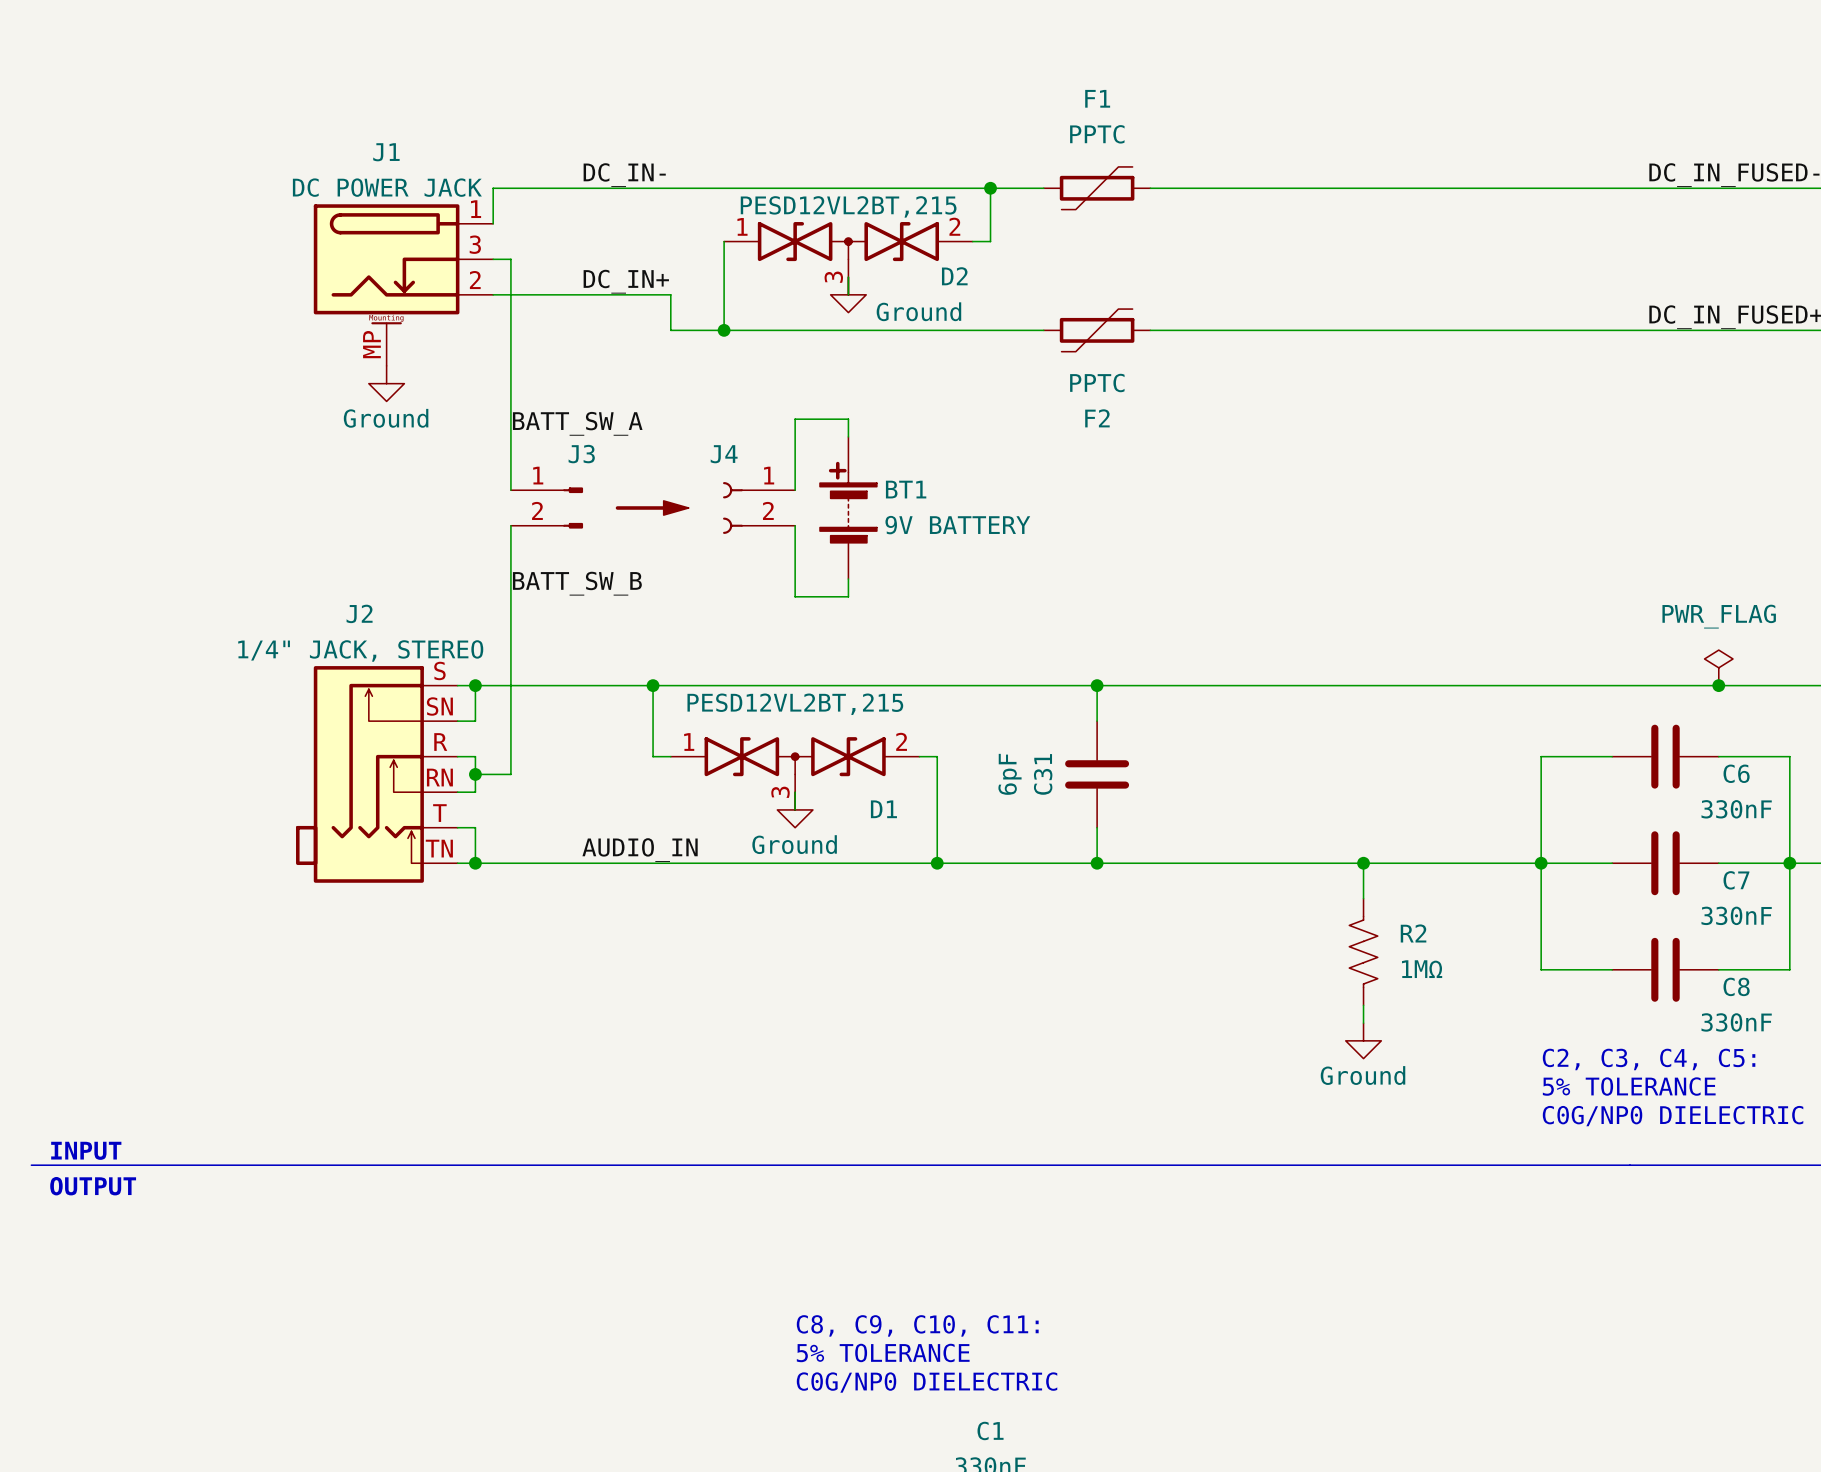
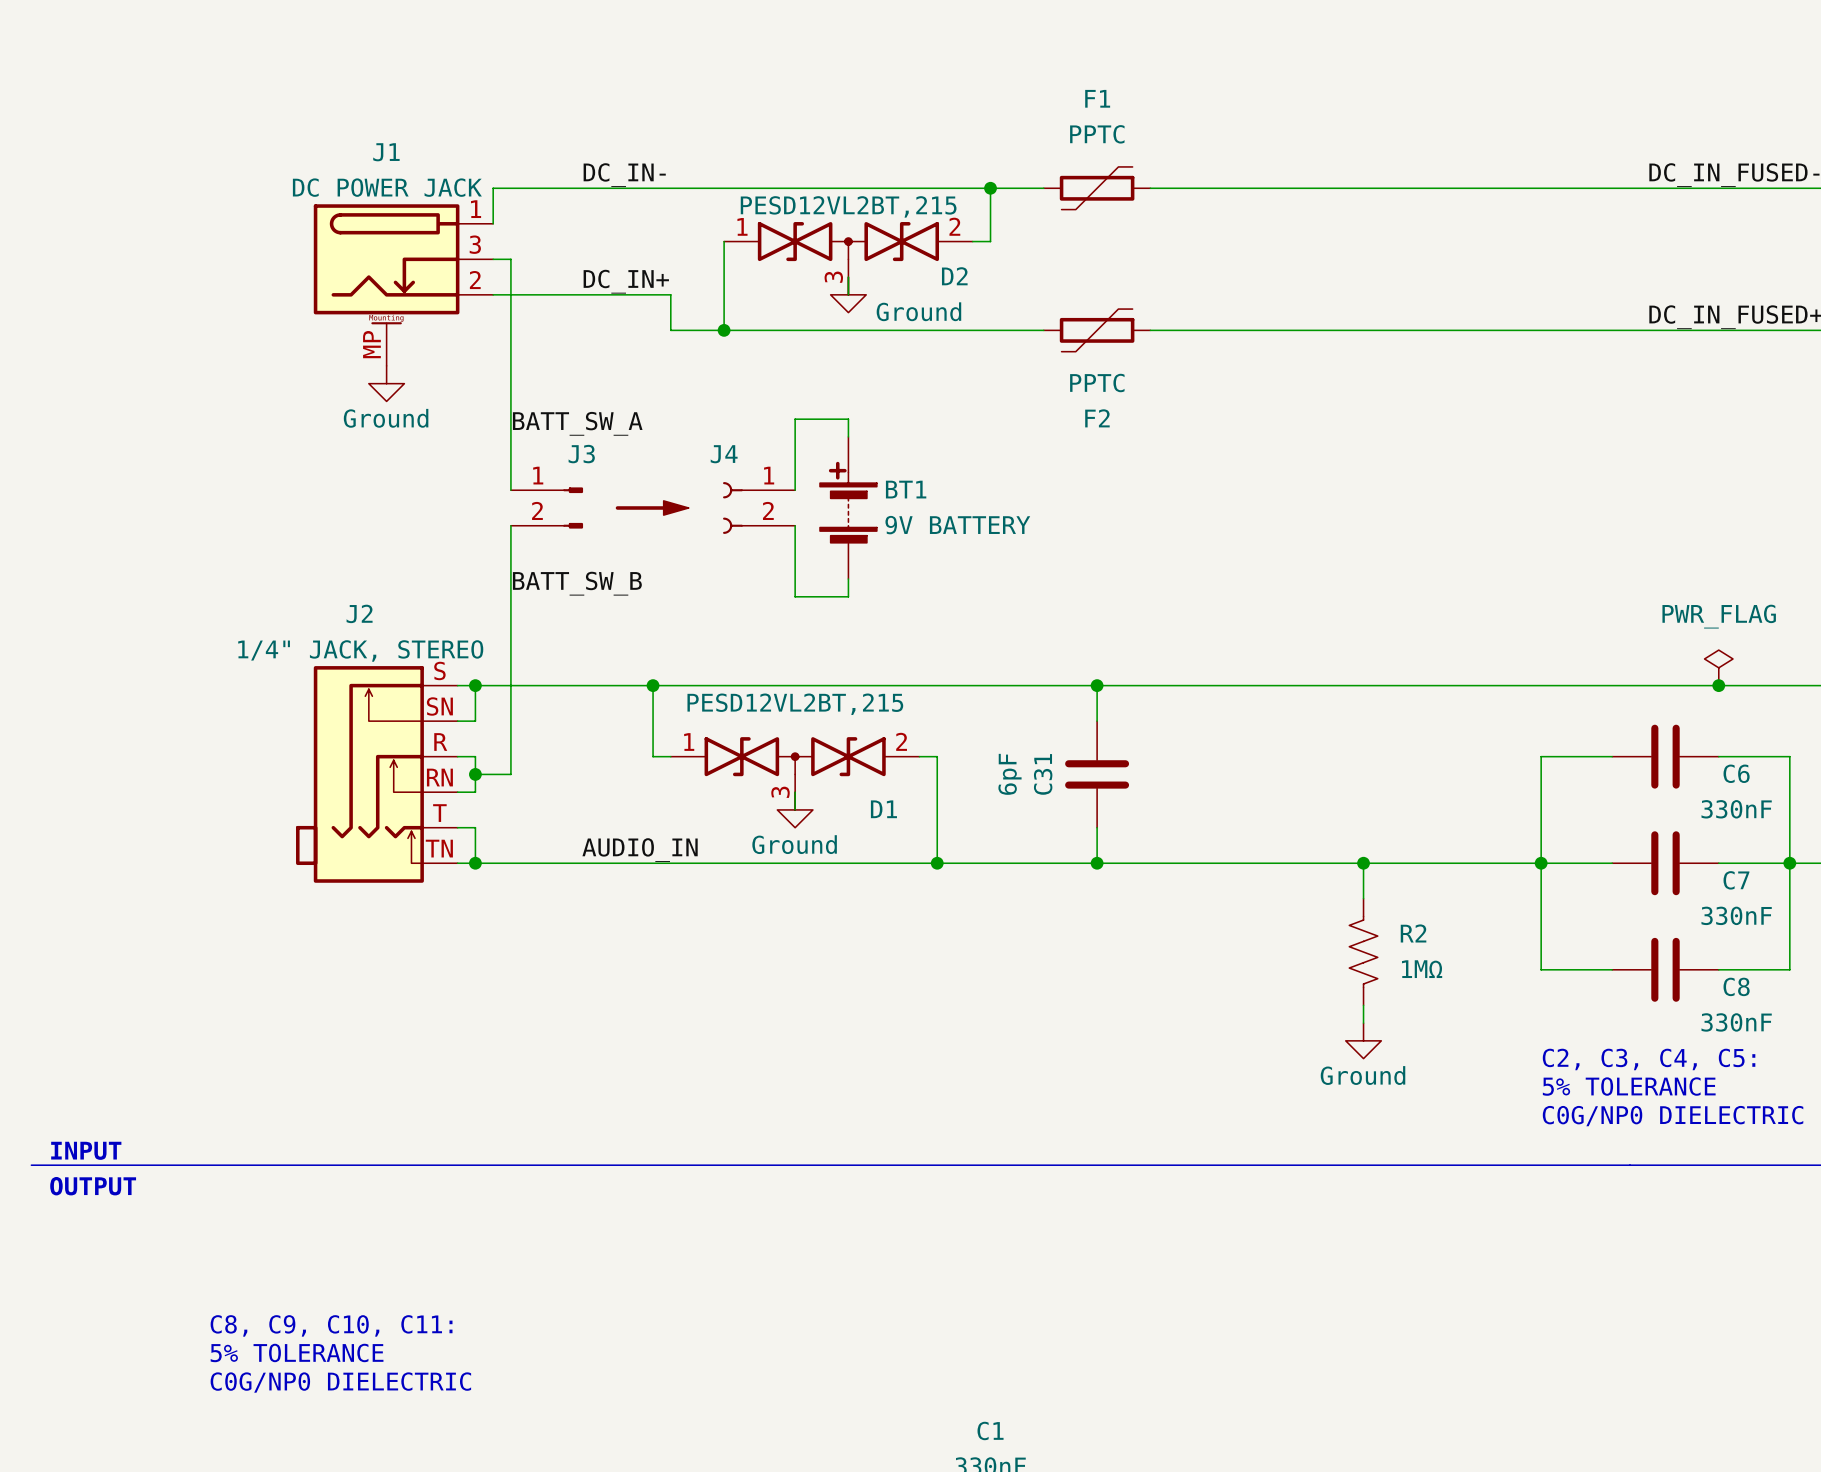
text: none -> C8, C9, C10, C11: (331, 1325)
text: C8, C9, C10, C11: (917, 1325) -> none
text: none -> 5% TOLERANCE (297, 1352)
text: 5% TOLERANCE (883, 1352) -> none
text: none -> C0G/NP0 DIELECTRIC (340, 1382)
text: C0G/NP0 DIELECTRIC (927, 1382) -> none

